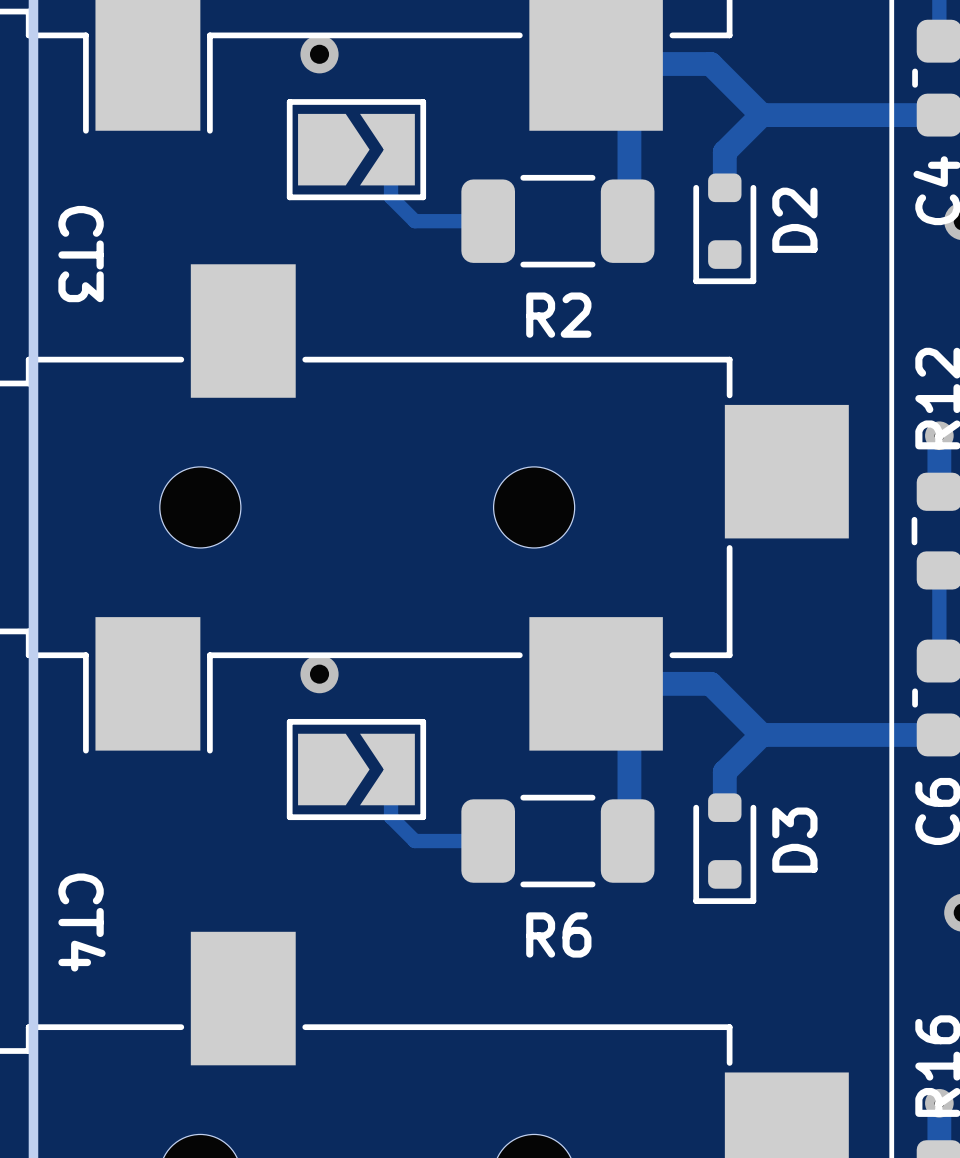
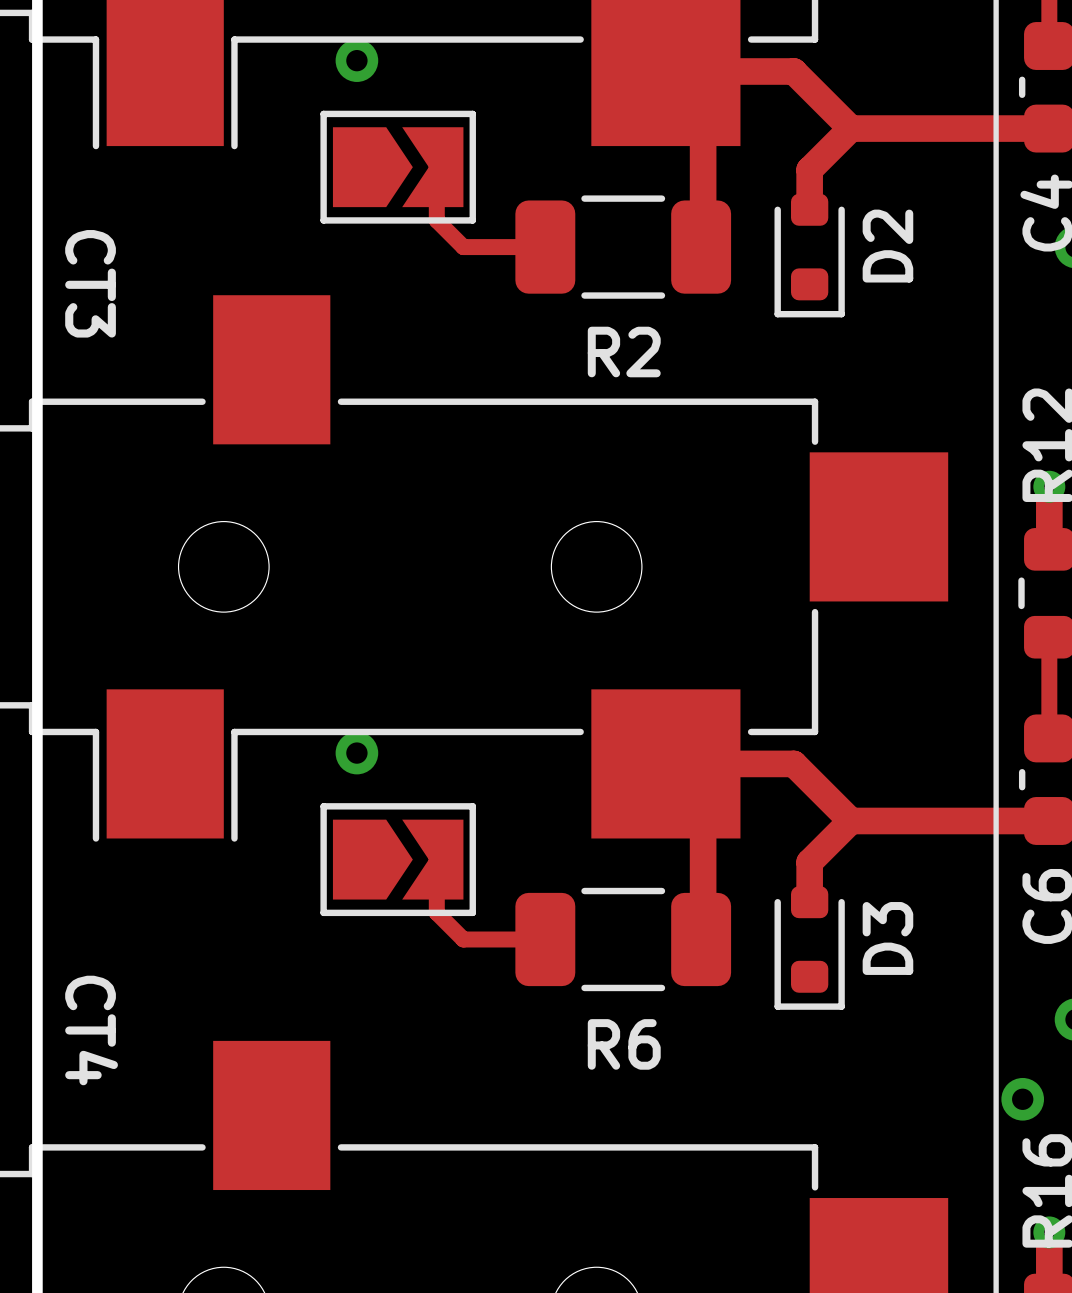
via: none -> (1022, 1099)

